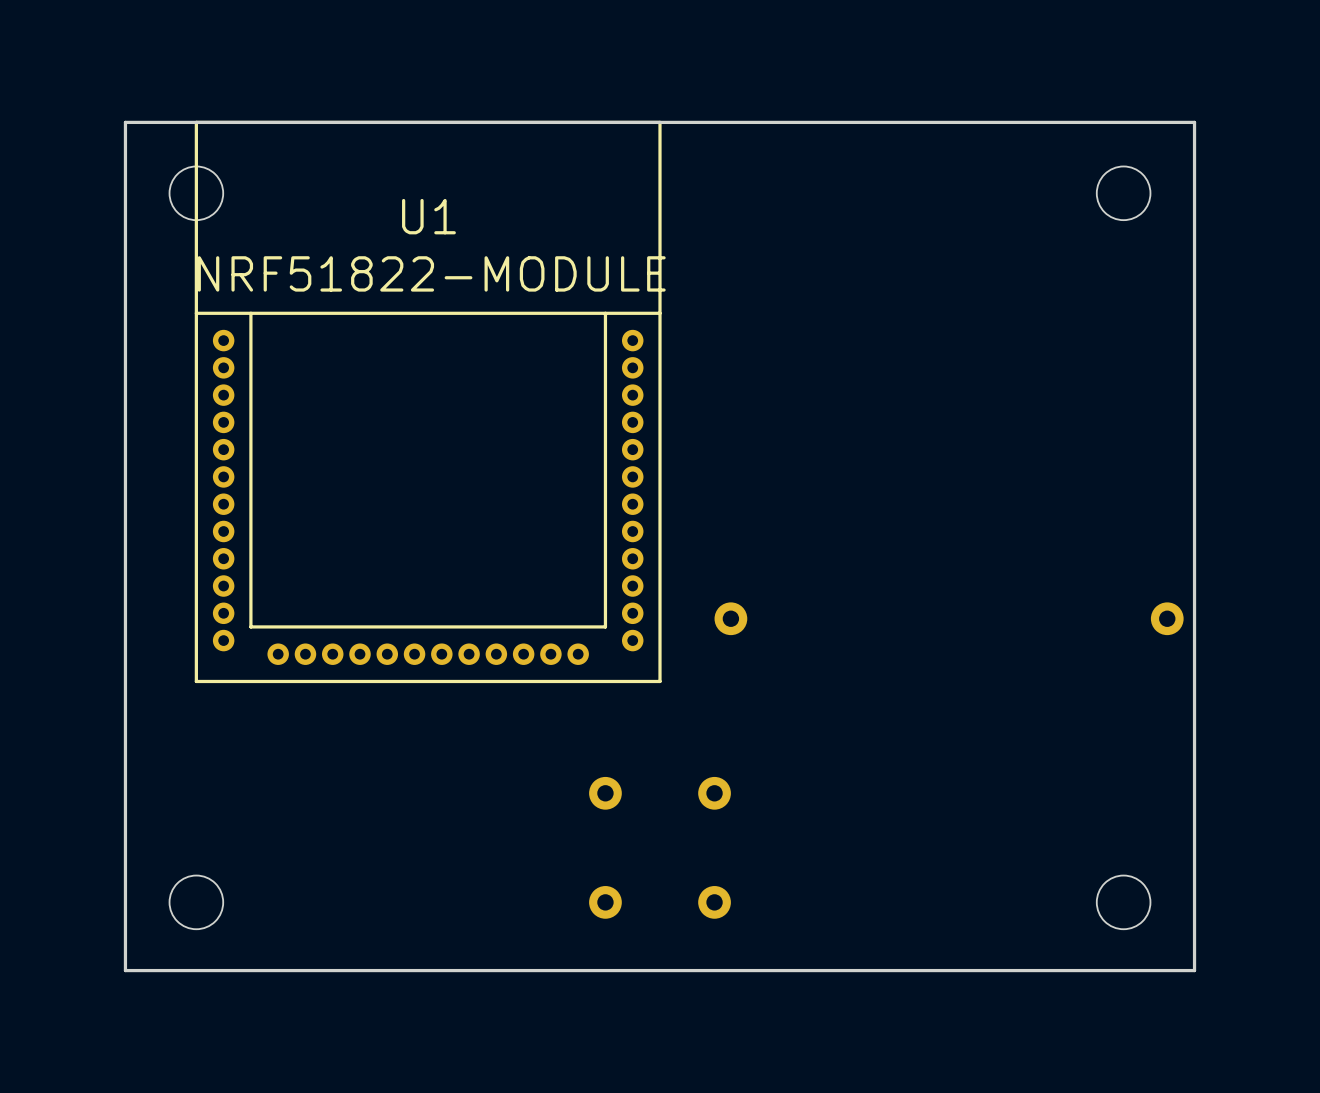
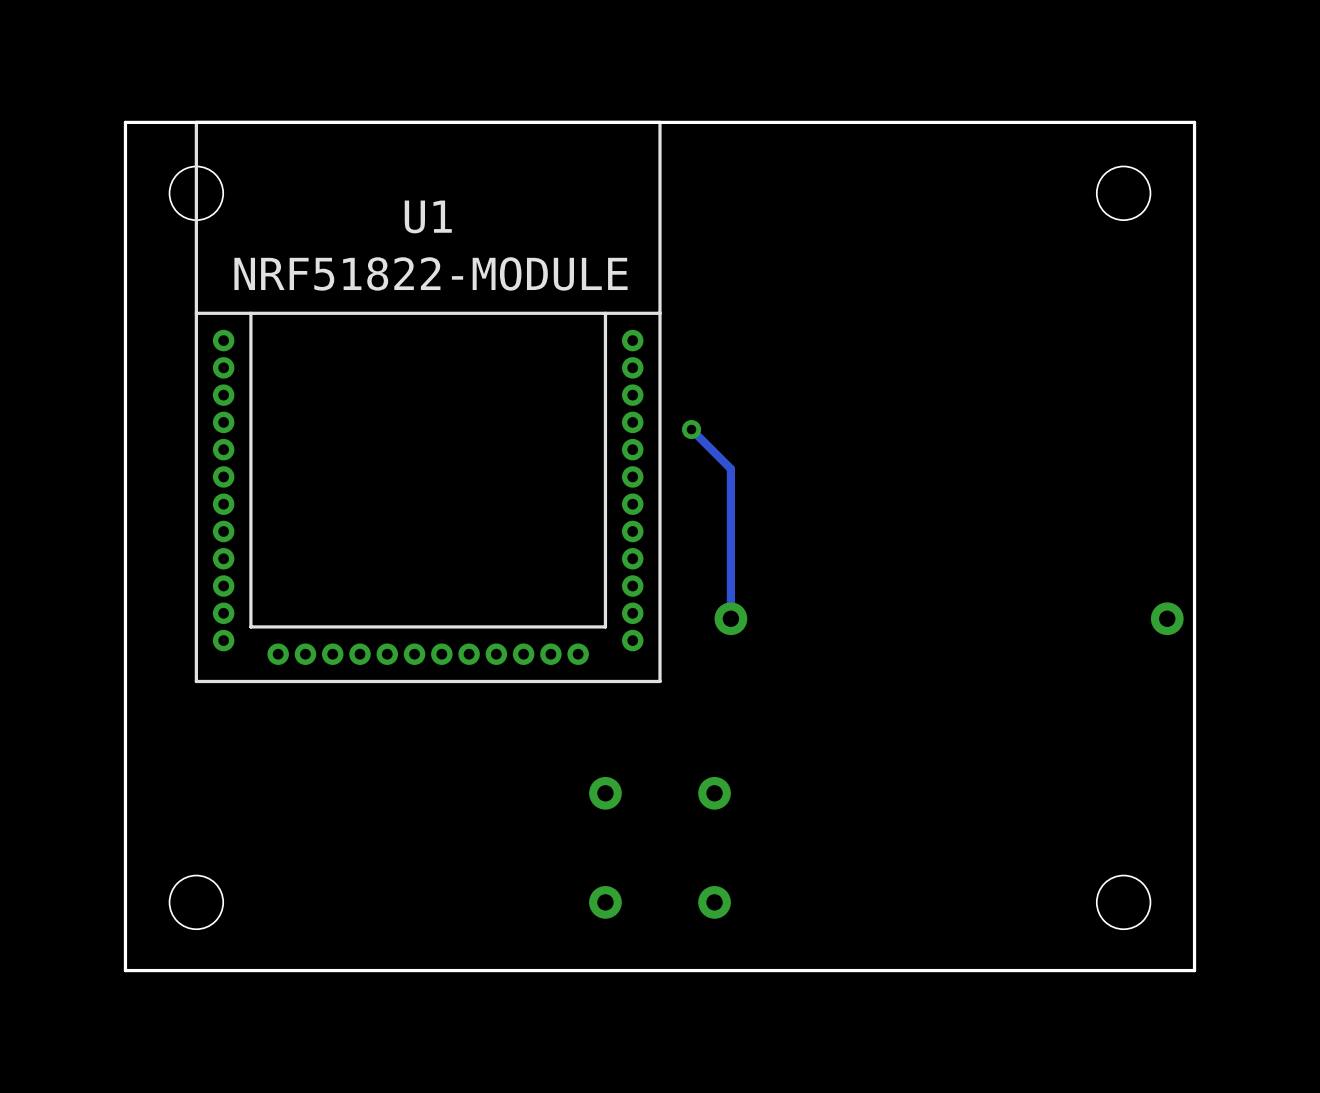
track: none -> (691, 429) (730, 468) (730, 618)
via: none -> (691, 429)

